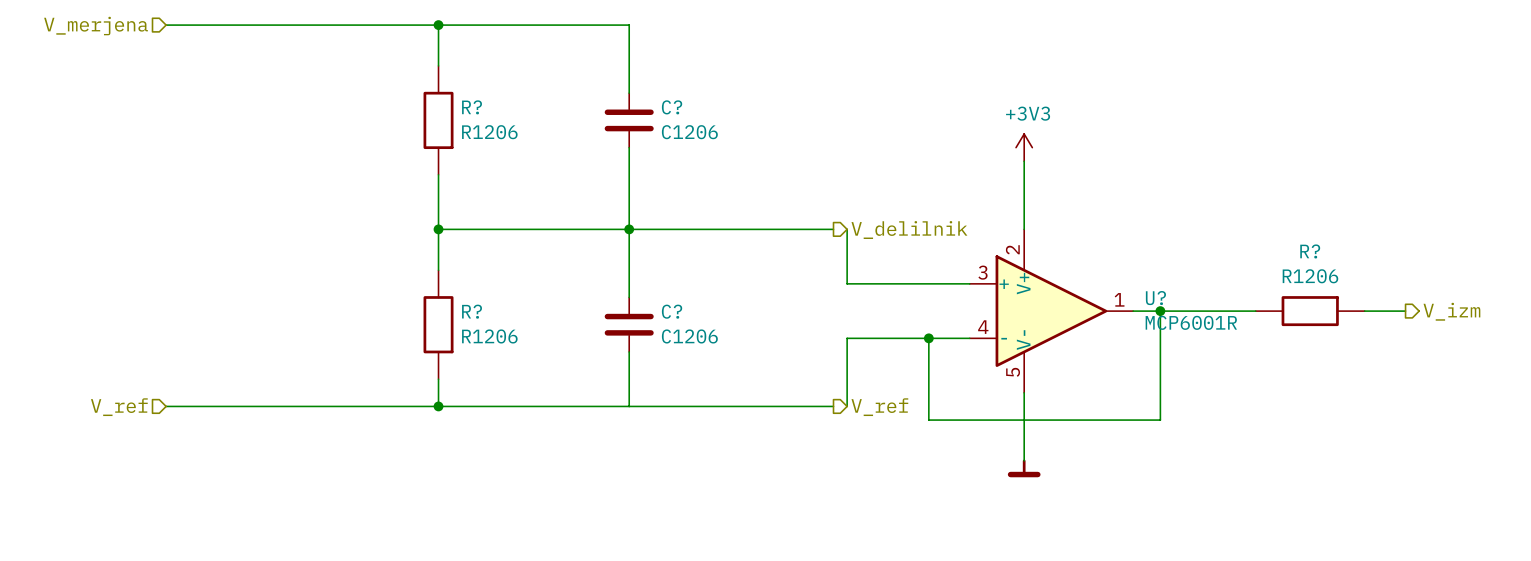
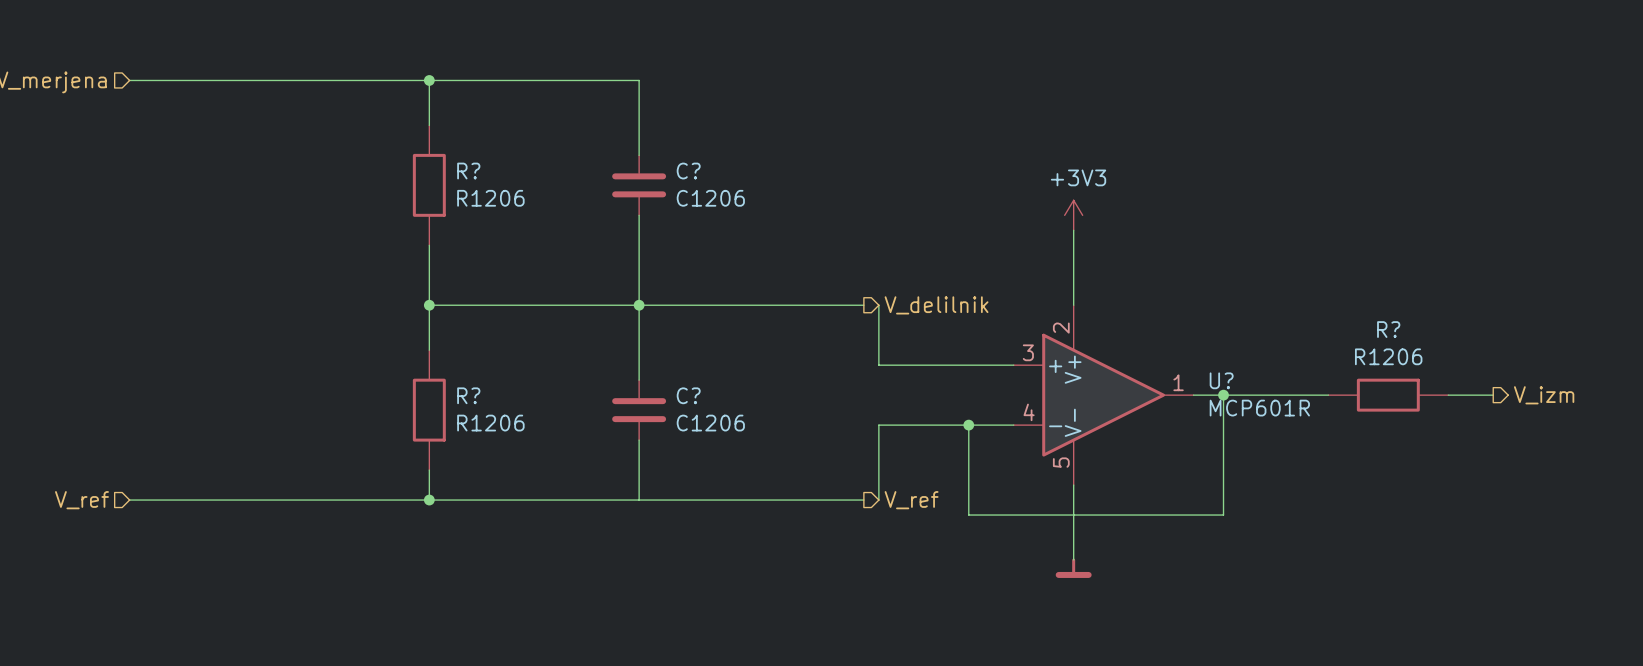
U? value: MCP6001R (1191, 322) -> MCP601R (1259, 408)

